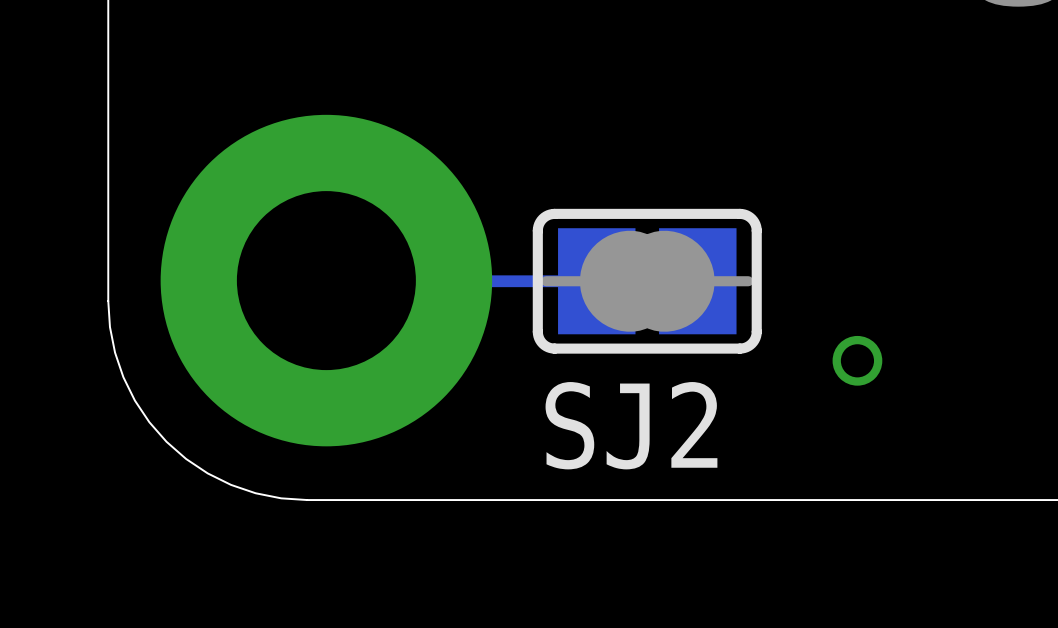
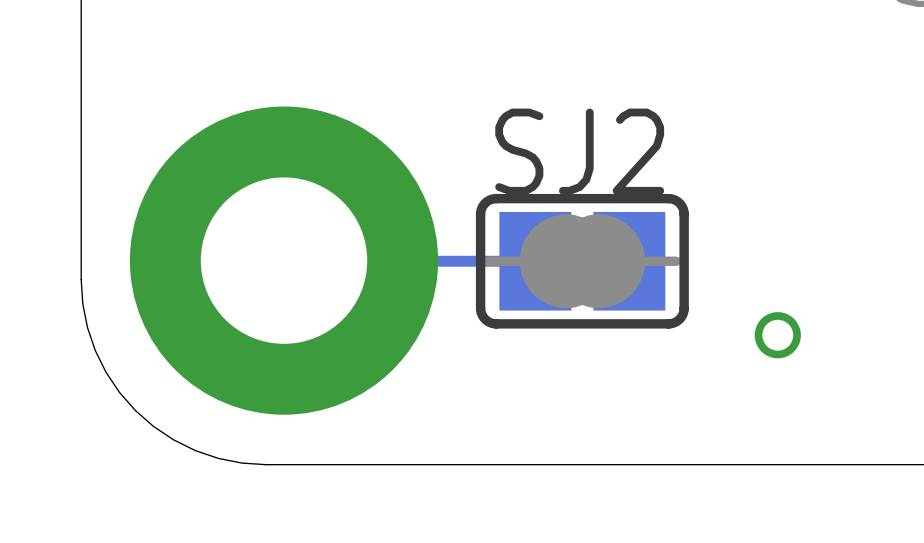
SJ2 name position: SJ2 (631, 425) -> SJ2 (579, 151)

